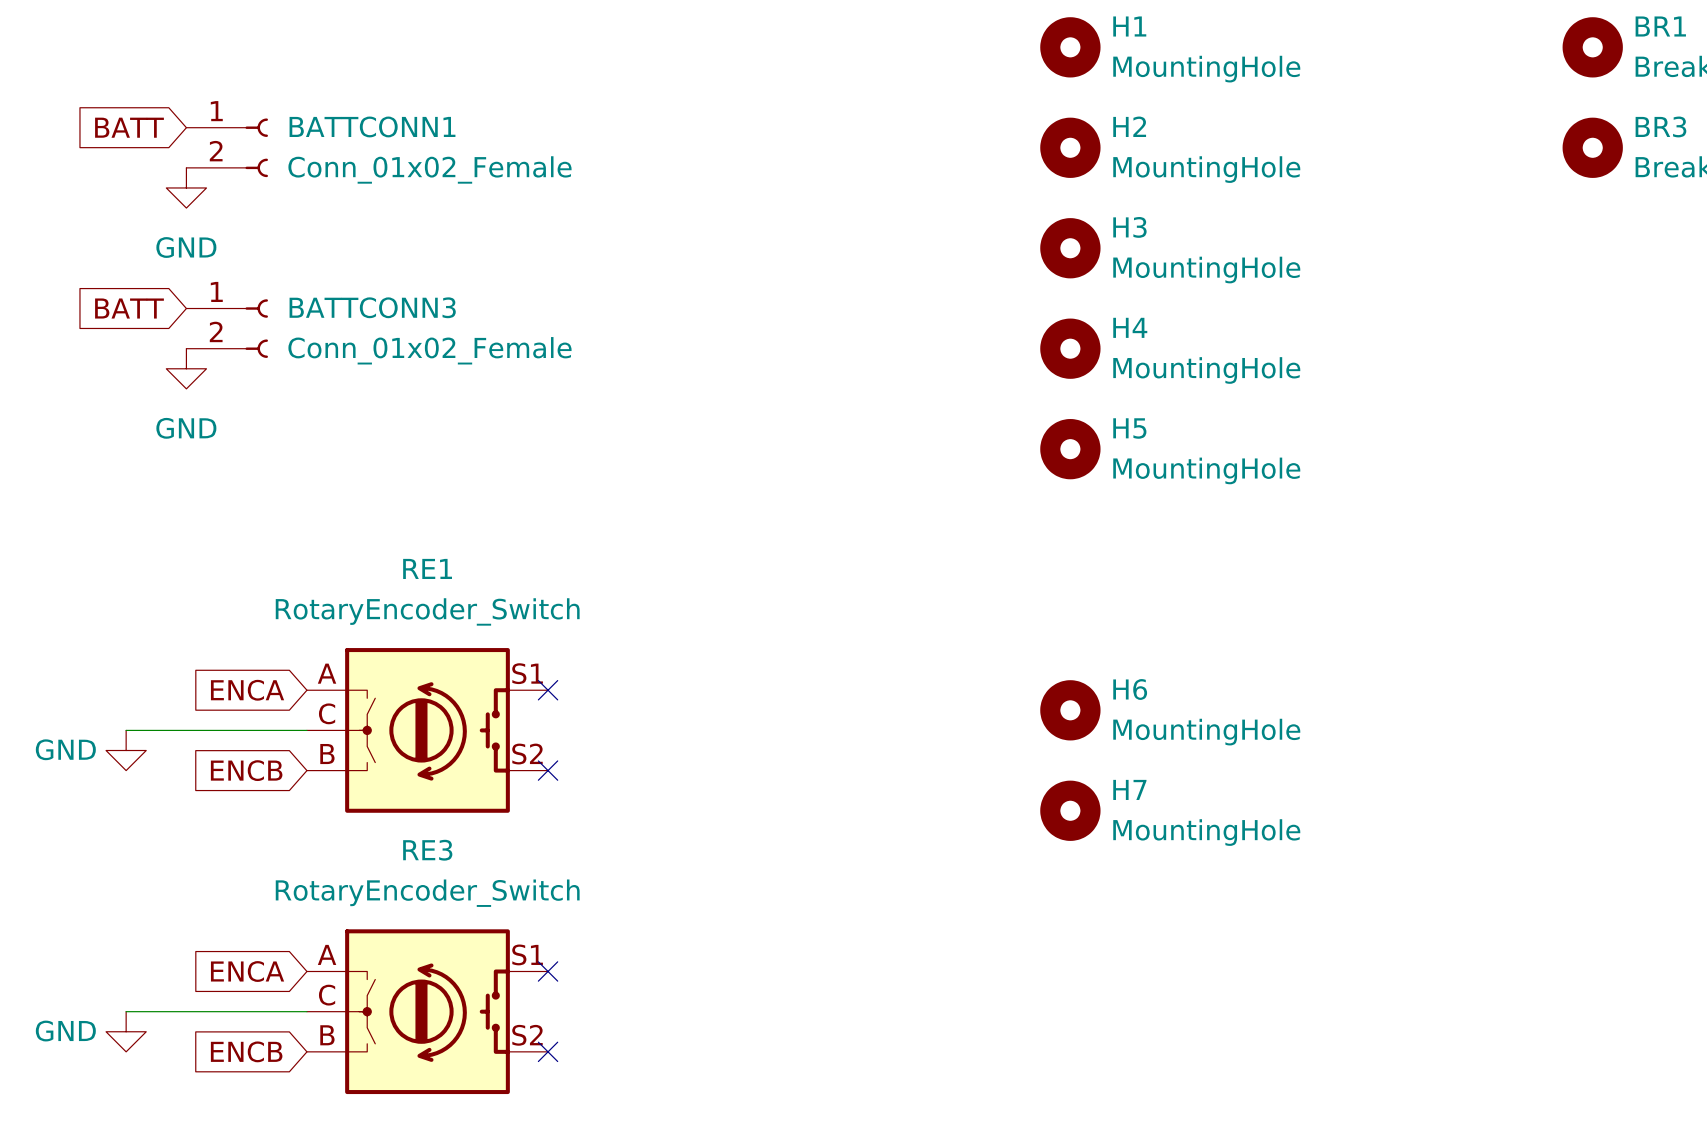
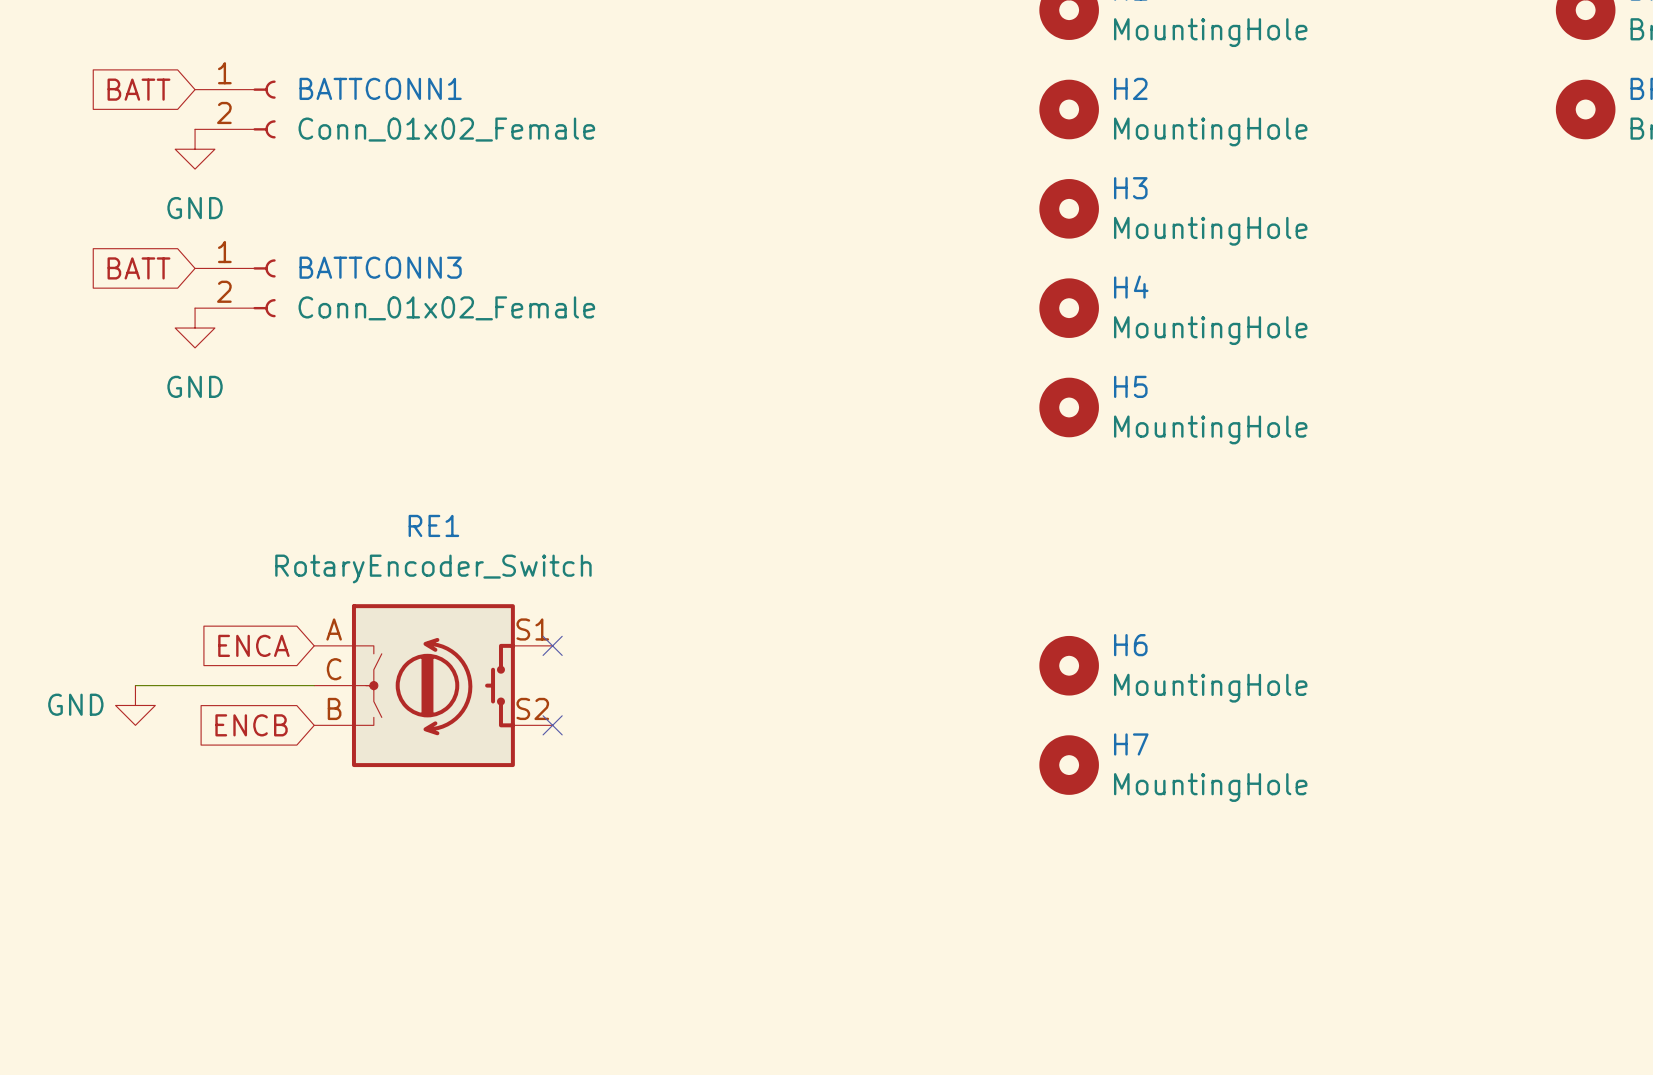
global label: ENCA (247, 971) -> none
no-connect mark: (548, 971) -> none
wire: (126, 1011) (306, 1011) -> none
RE3: RotaryEncoder_Switch (427, 1011) -> none
power symbol: GND (126, 1031) -> none
global label: ENCB (246, 1051) -> none
no-connect mark: (548, 1051) -> none

